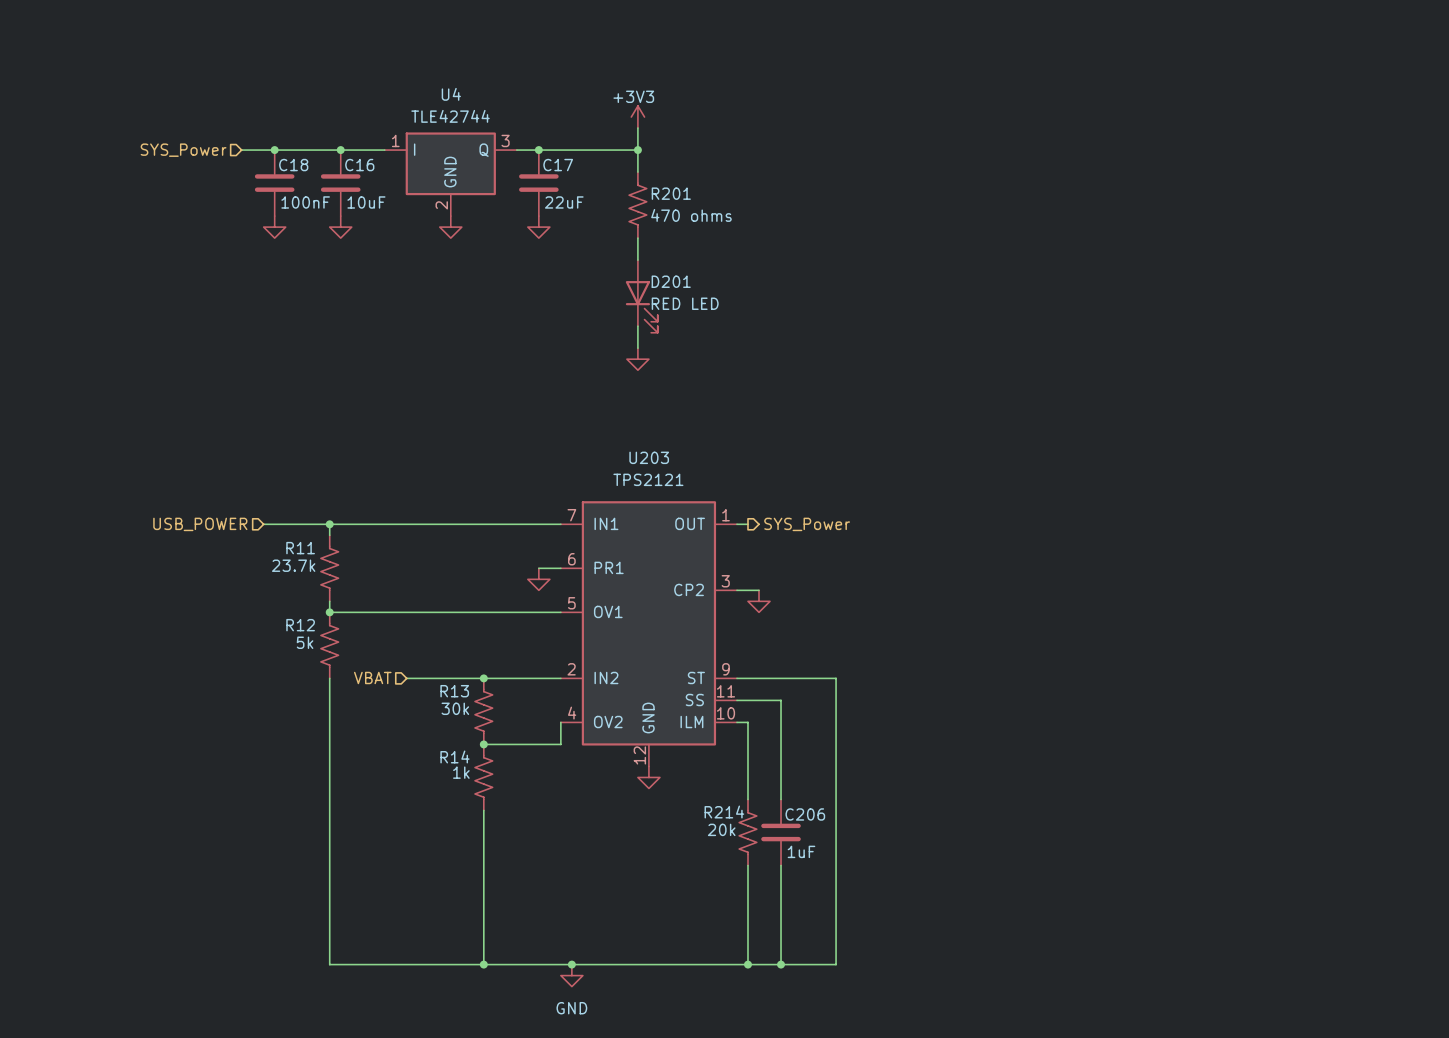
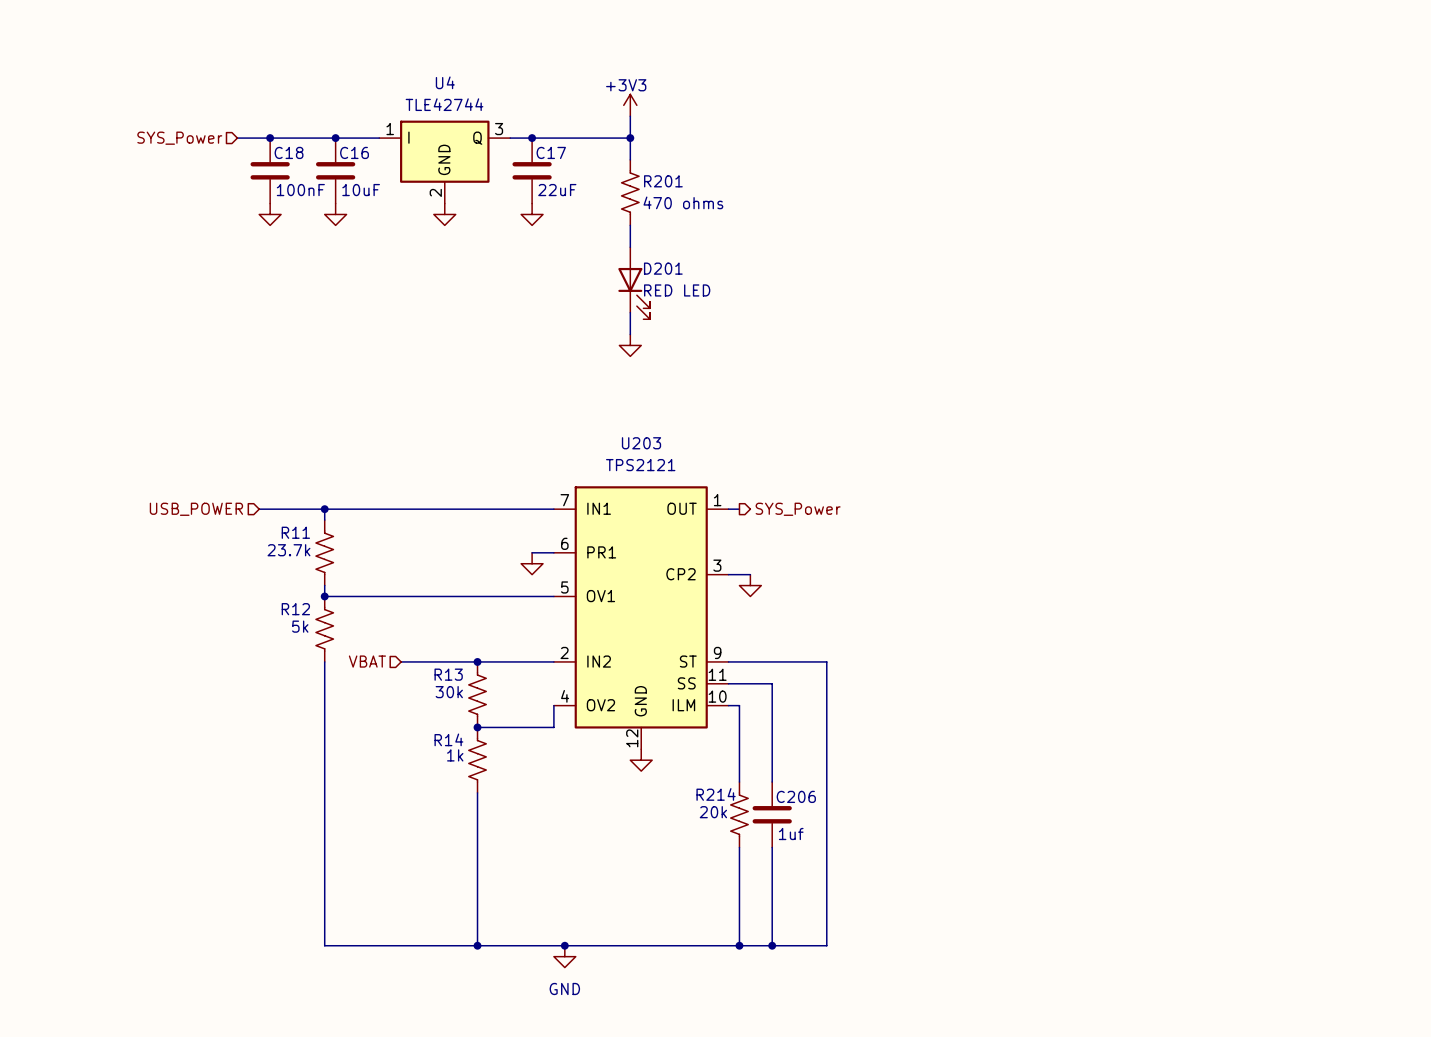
C206 value: 1uF (801, 851) -> 1uf (791, 834)

